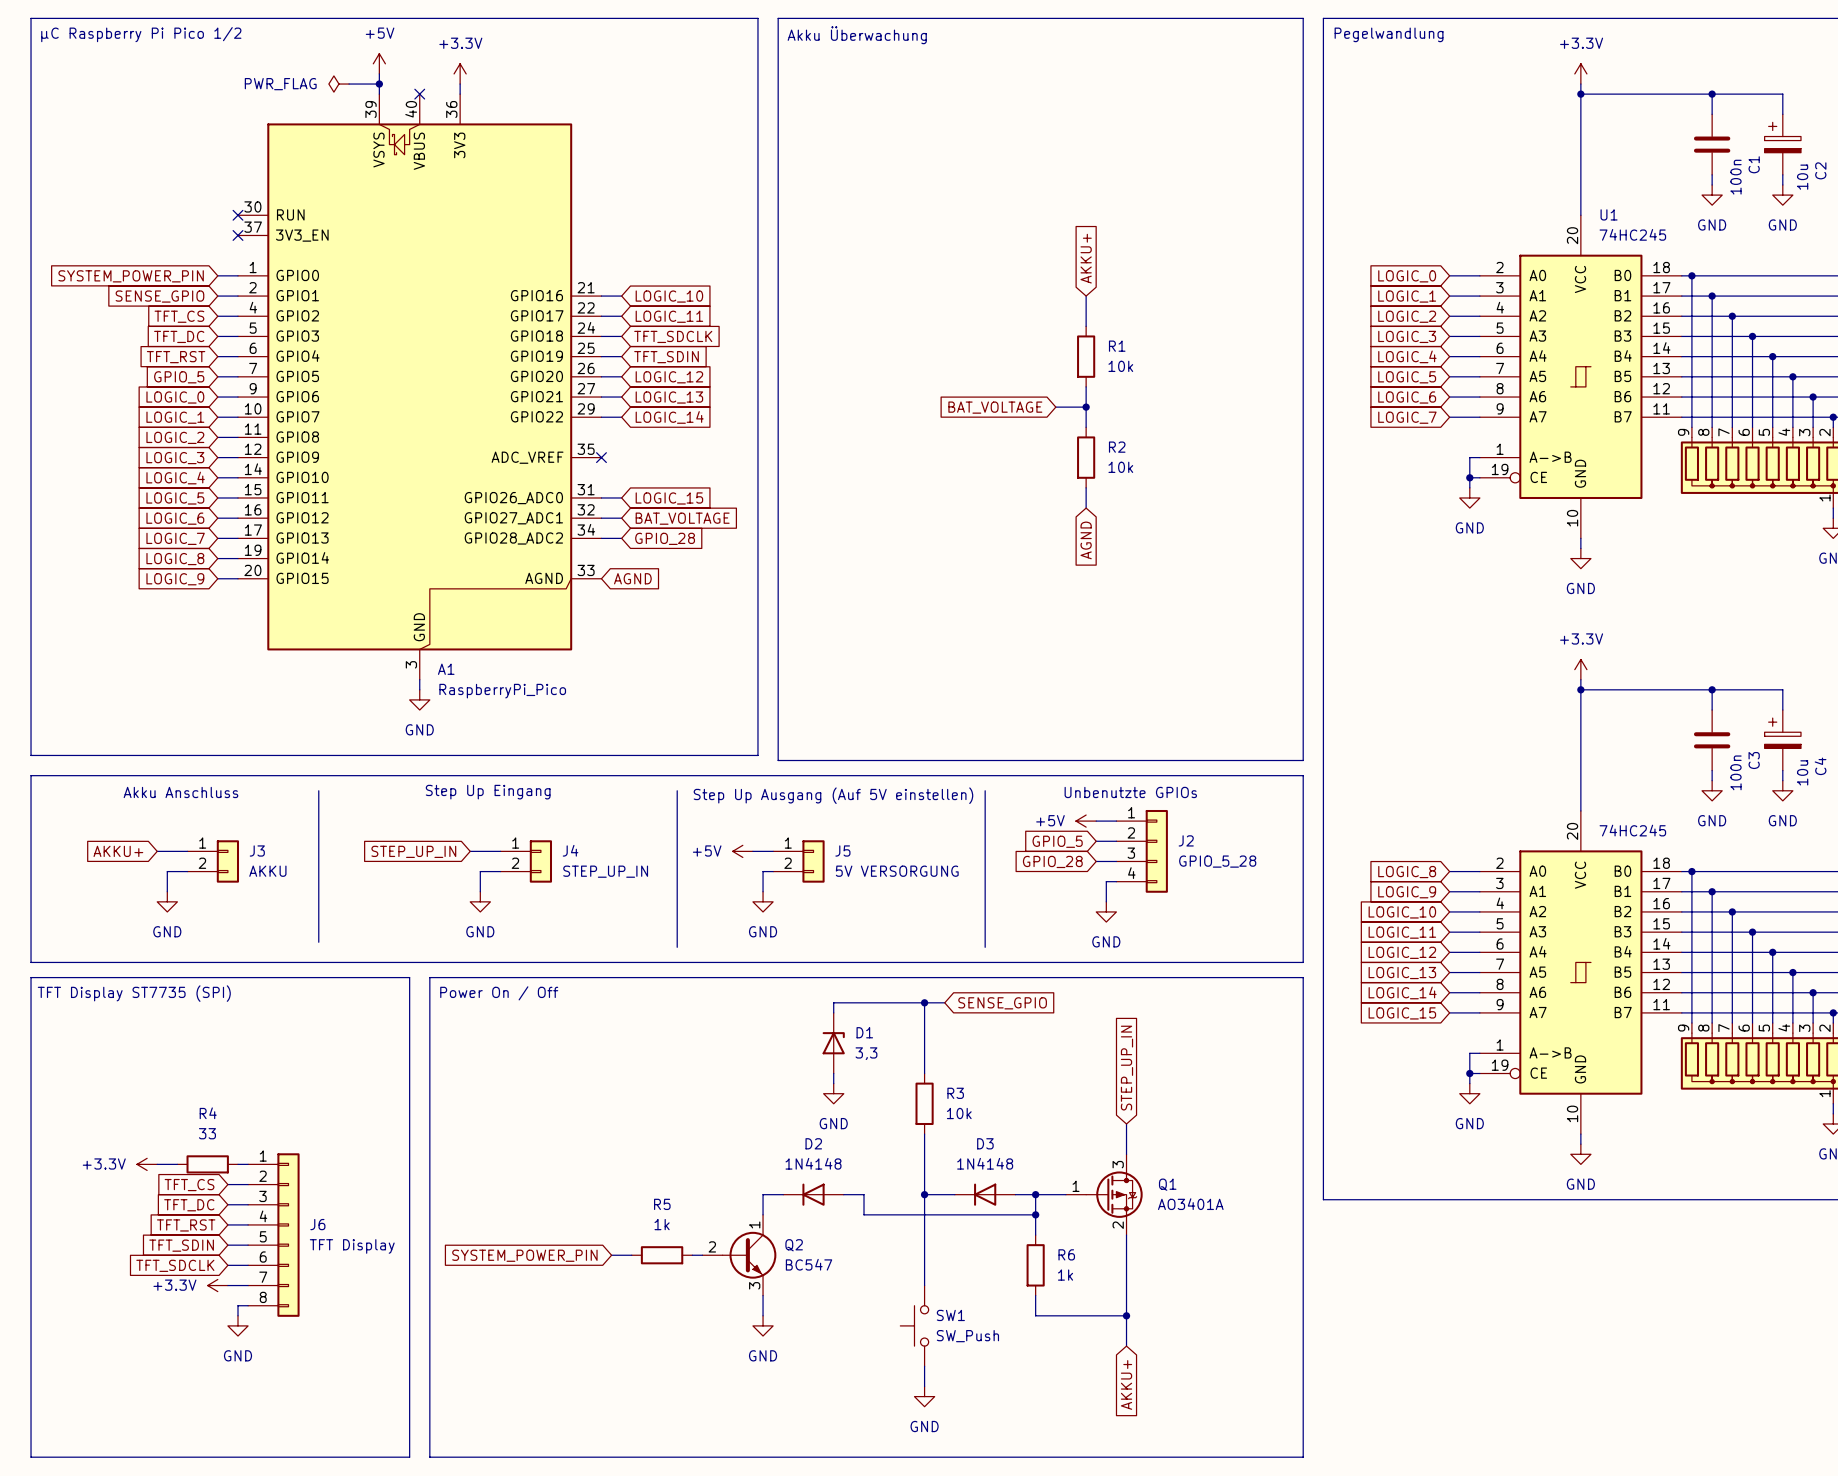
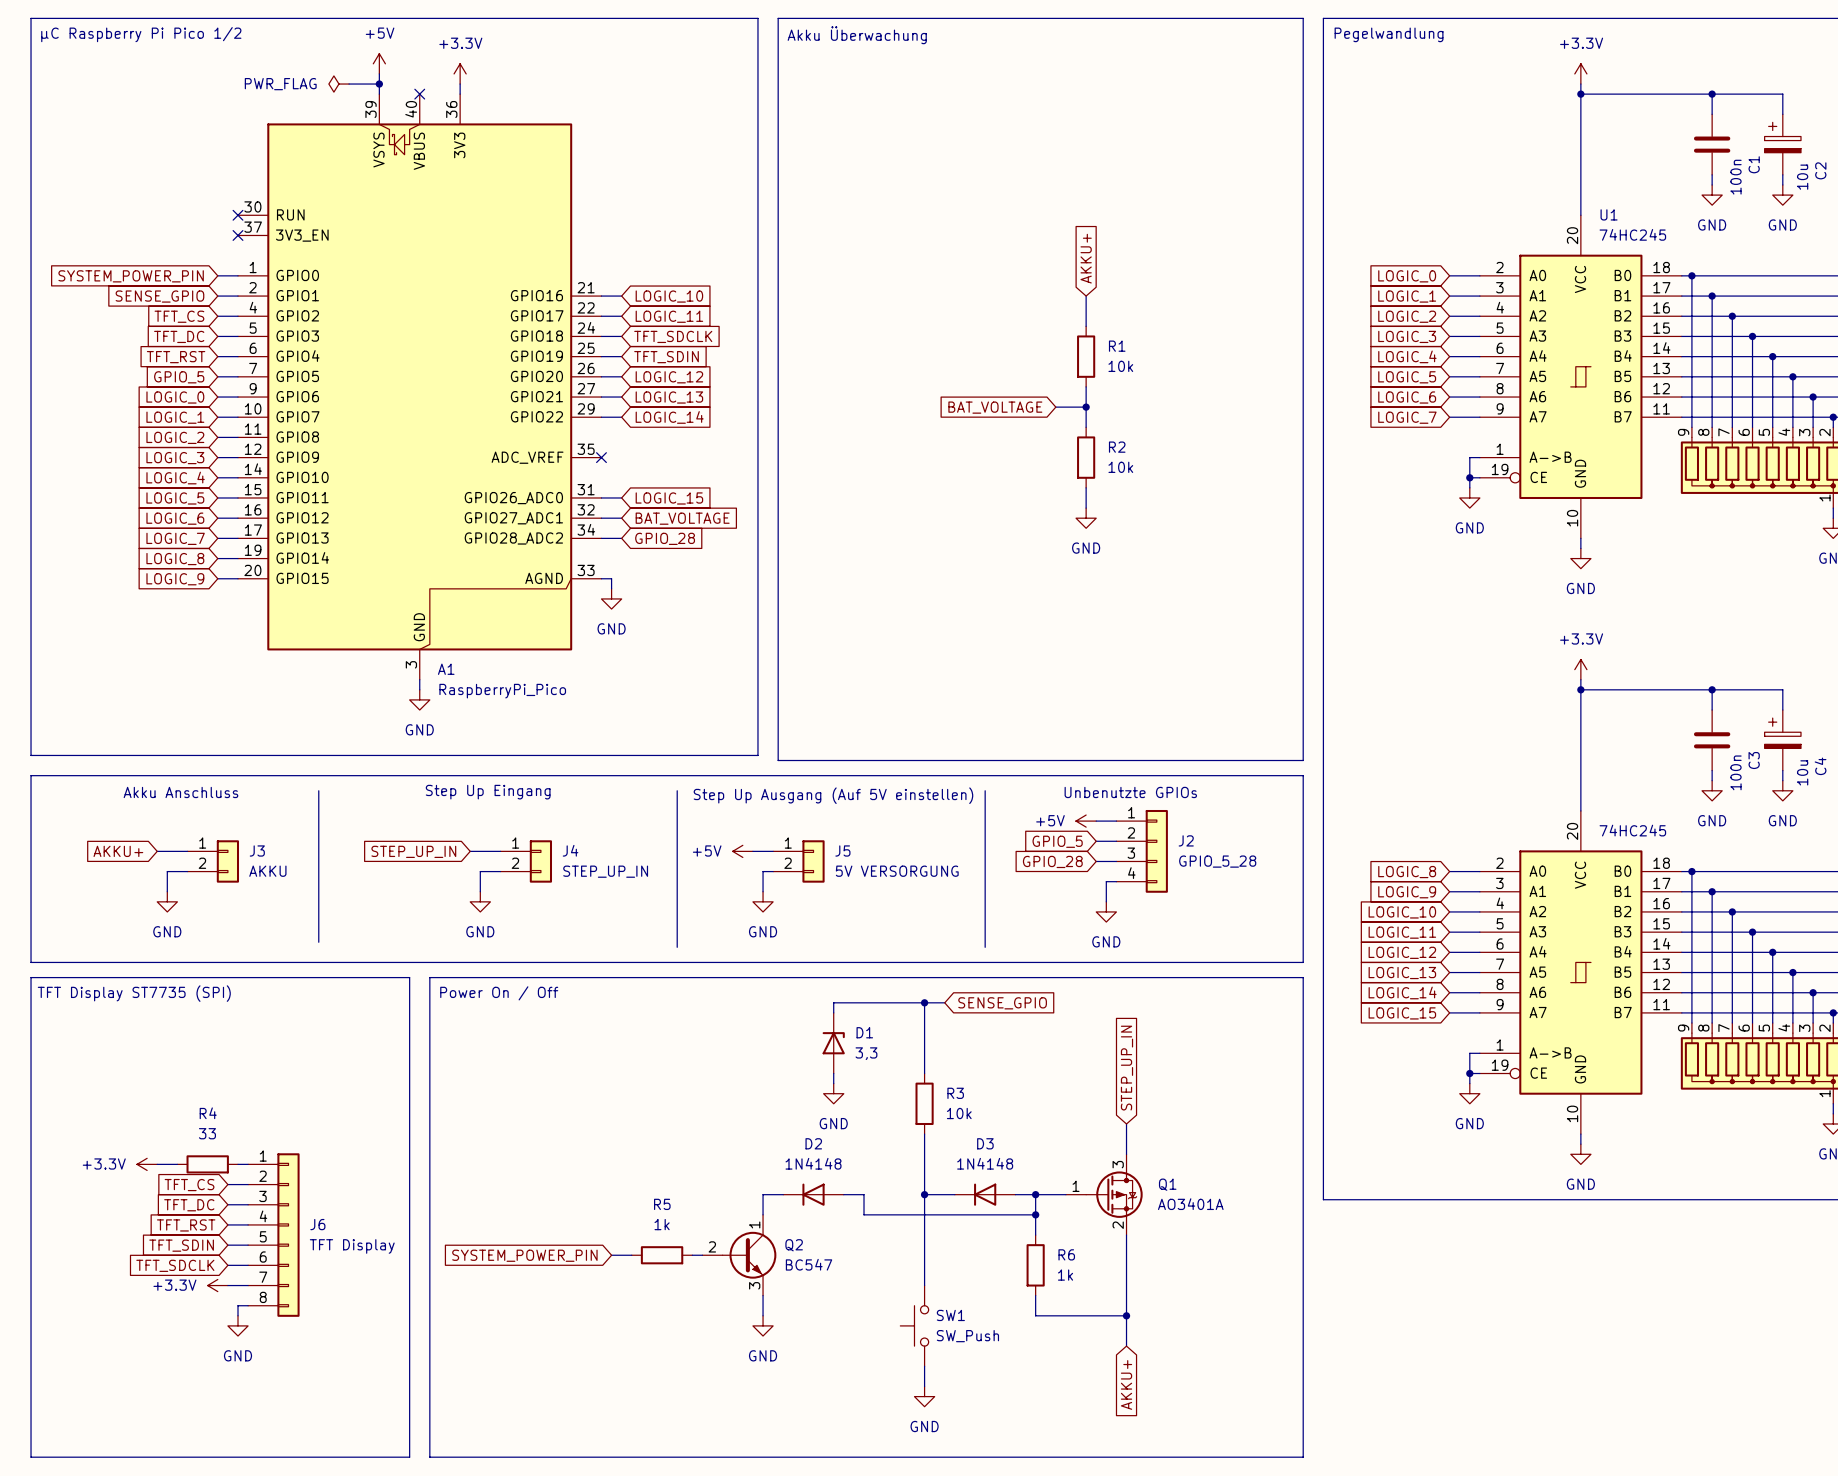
power symbol: none -> GND (1086, 518)
global label: AGND (1086, 540) -> none
wire: none -> (601, 578) (611, 578) (611, 588)
global label: AGND (632, 578) -> none
power symbol: none -> GND (611, 598)

